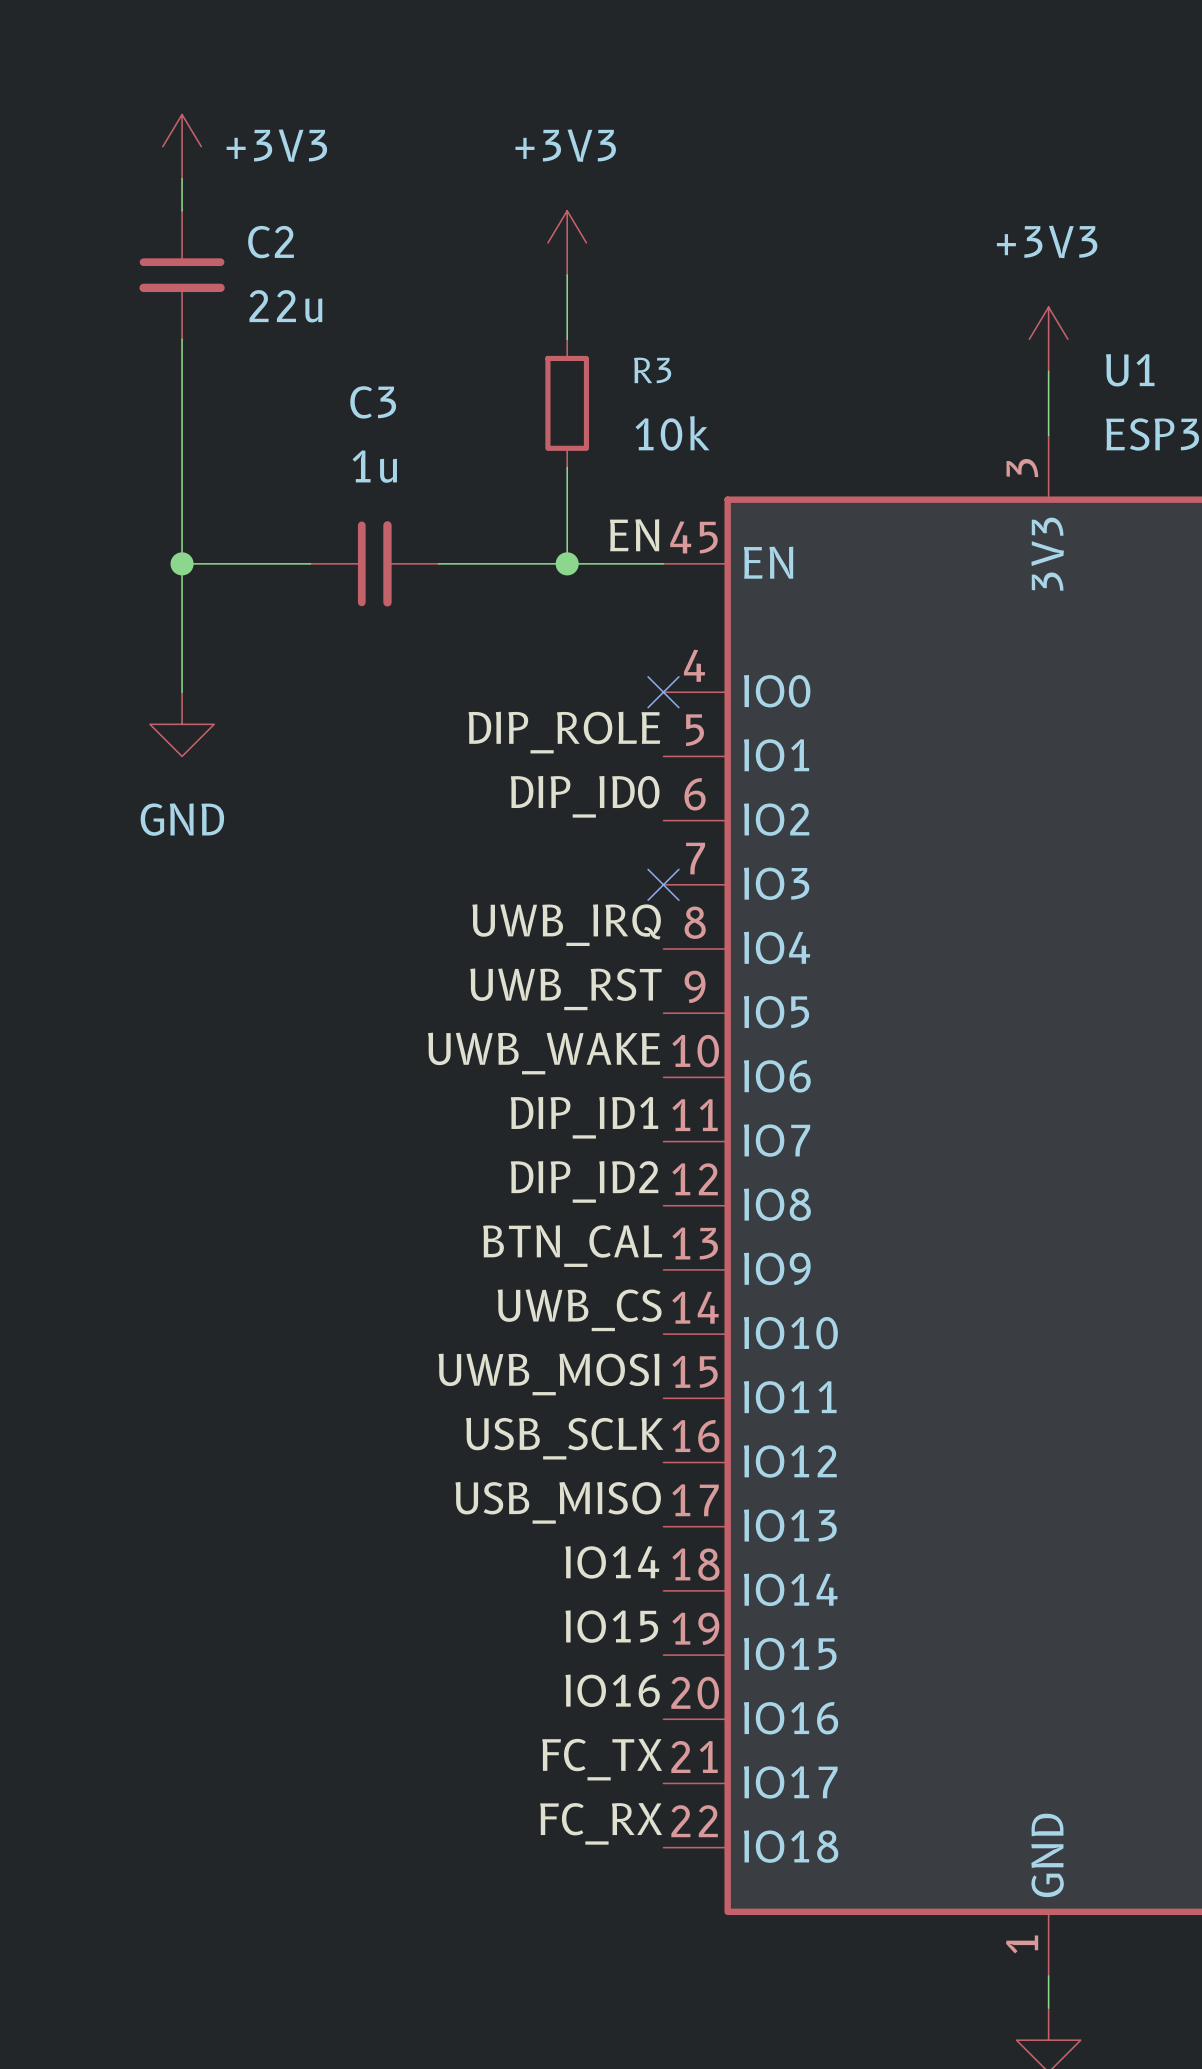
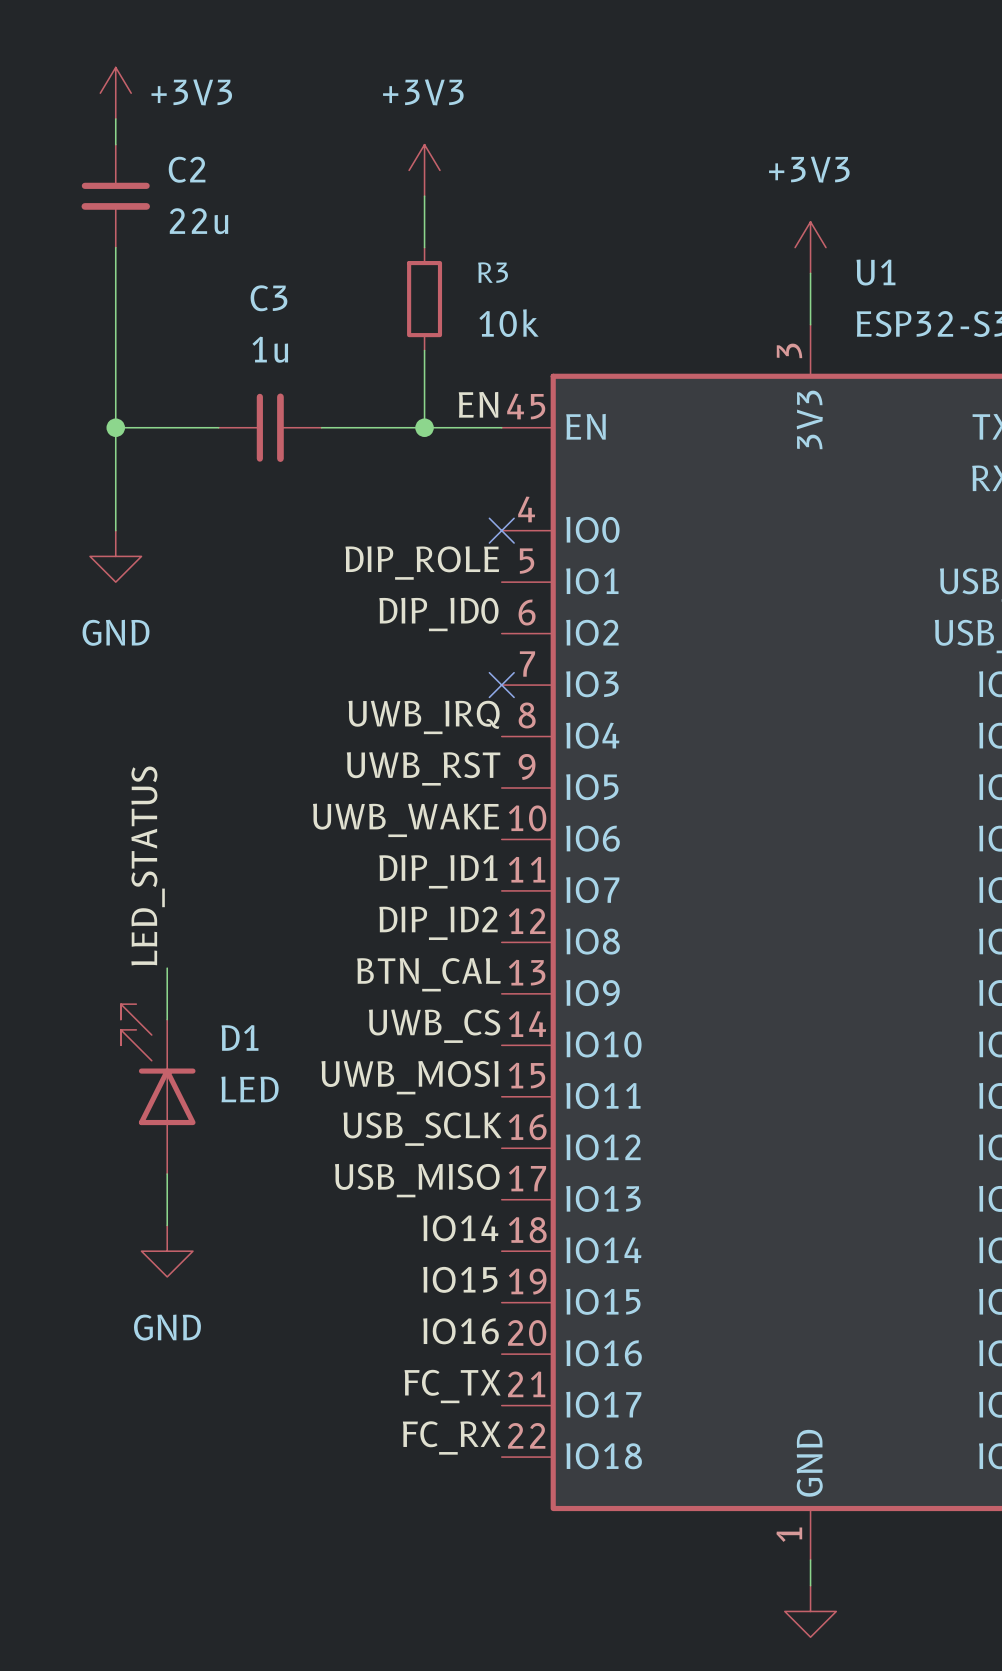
label: none -> LED_STATUS (148, 865)
wire: none -> (167, 968) (167, 1019)
D1: none -> LED (158, 1089)
wire: none -> (167, 1173) (167, 1225)
power symbol: none -> GND (167, 1251)

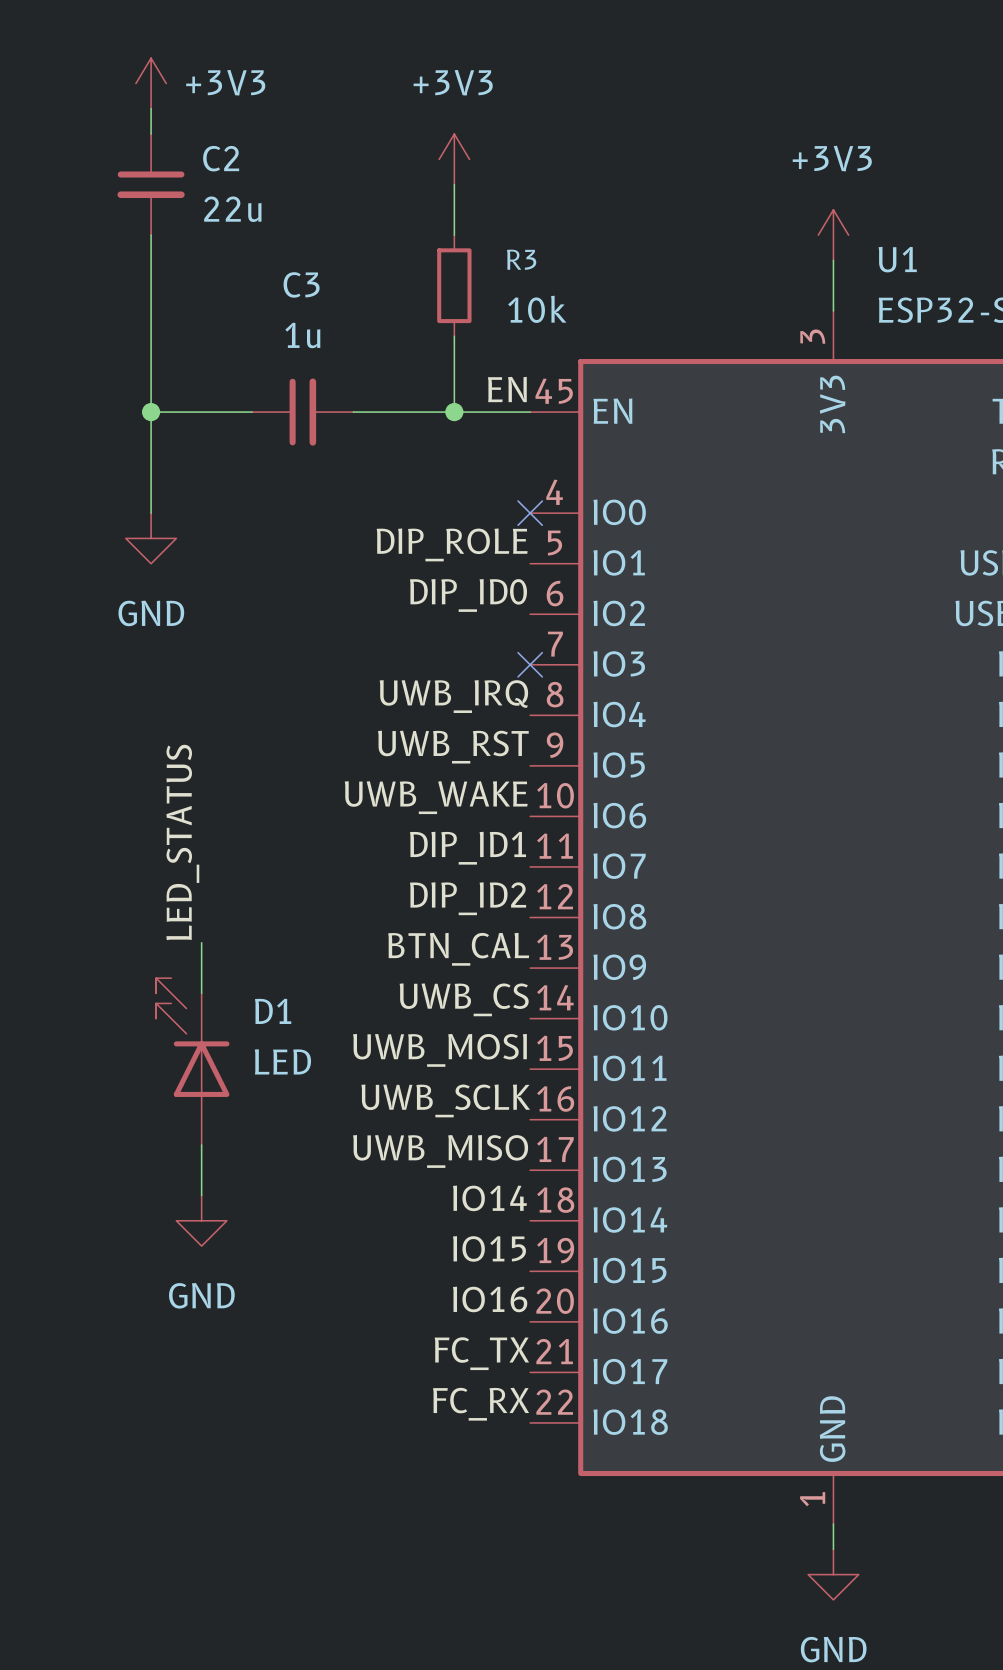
label: USB_SCLK (422, 1129) -> UWB_SCLK (445, 1100)
label: USB_MISO (417, 1180) -> UWB_MISO (440, 1151)

